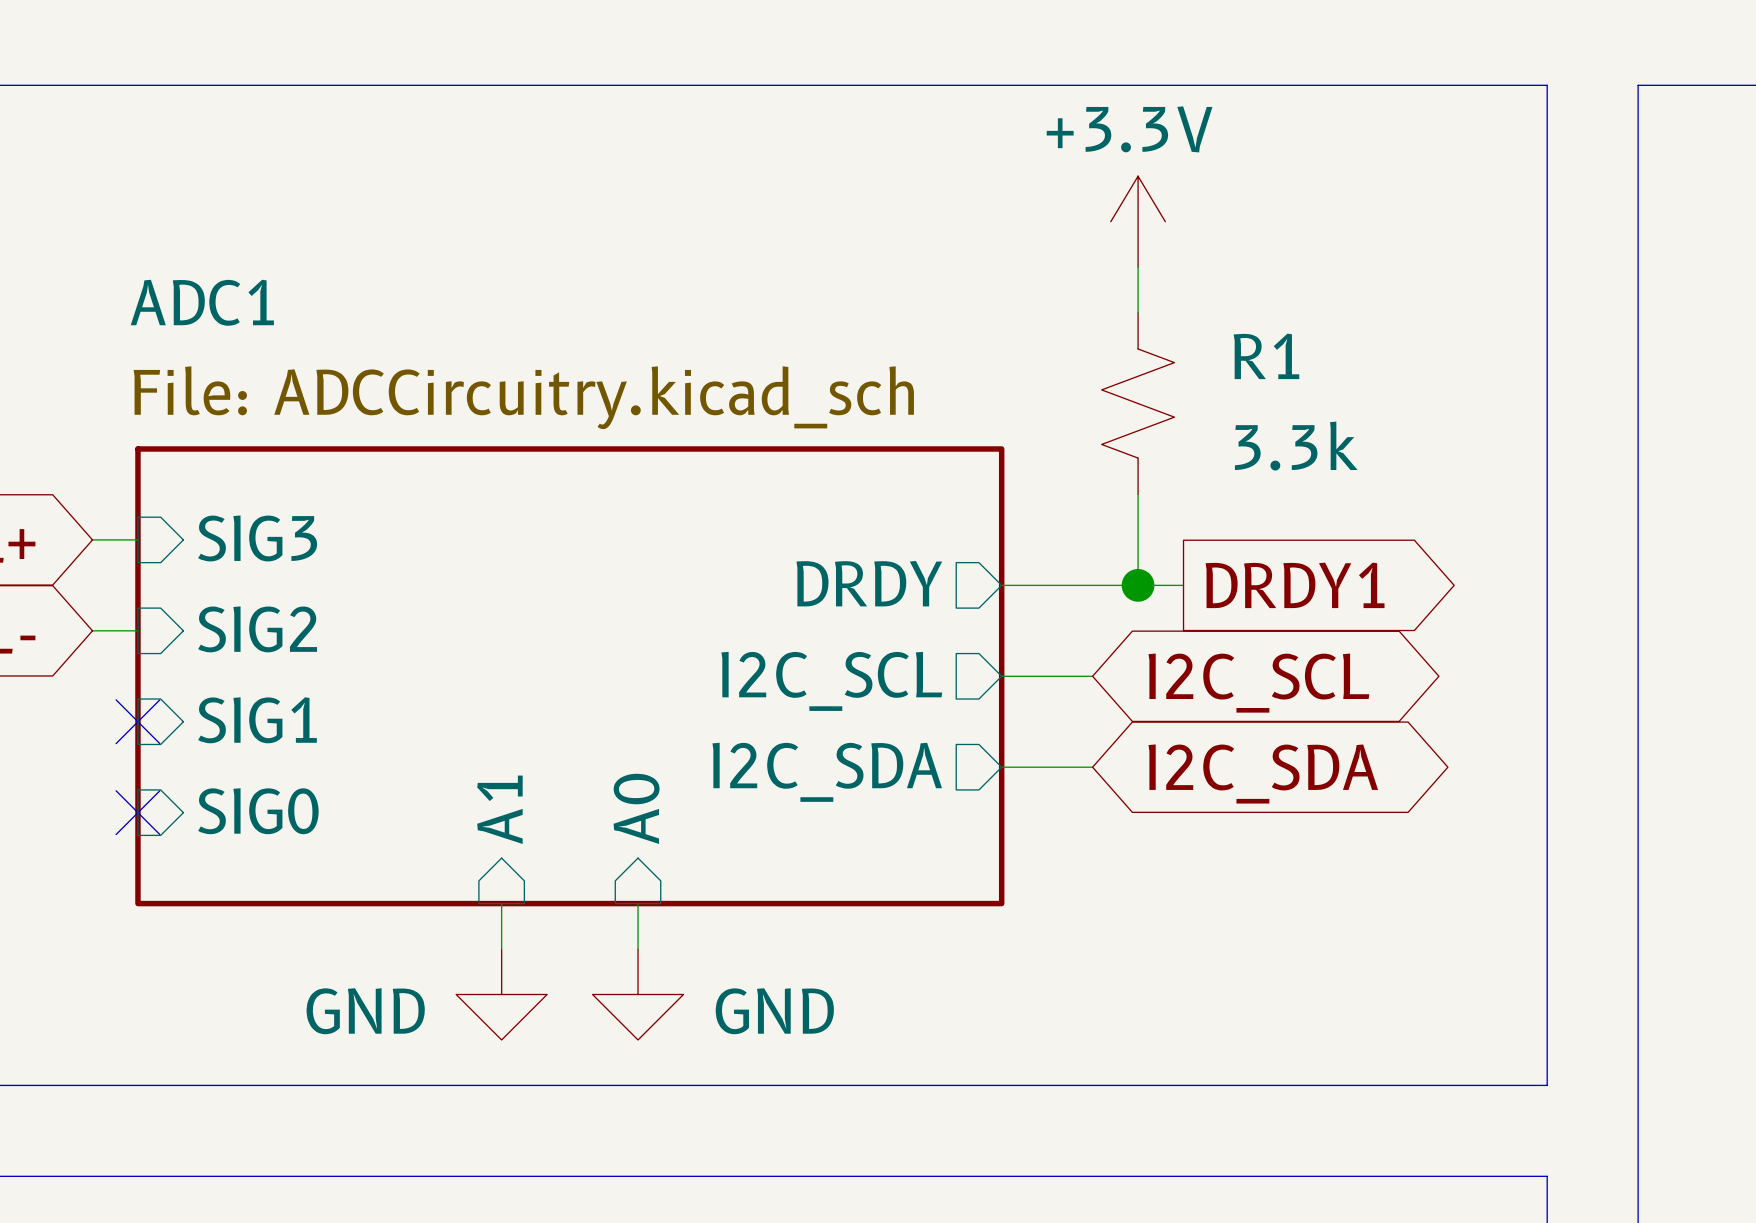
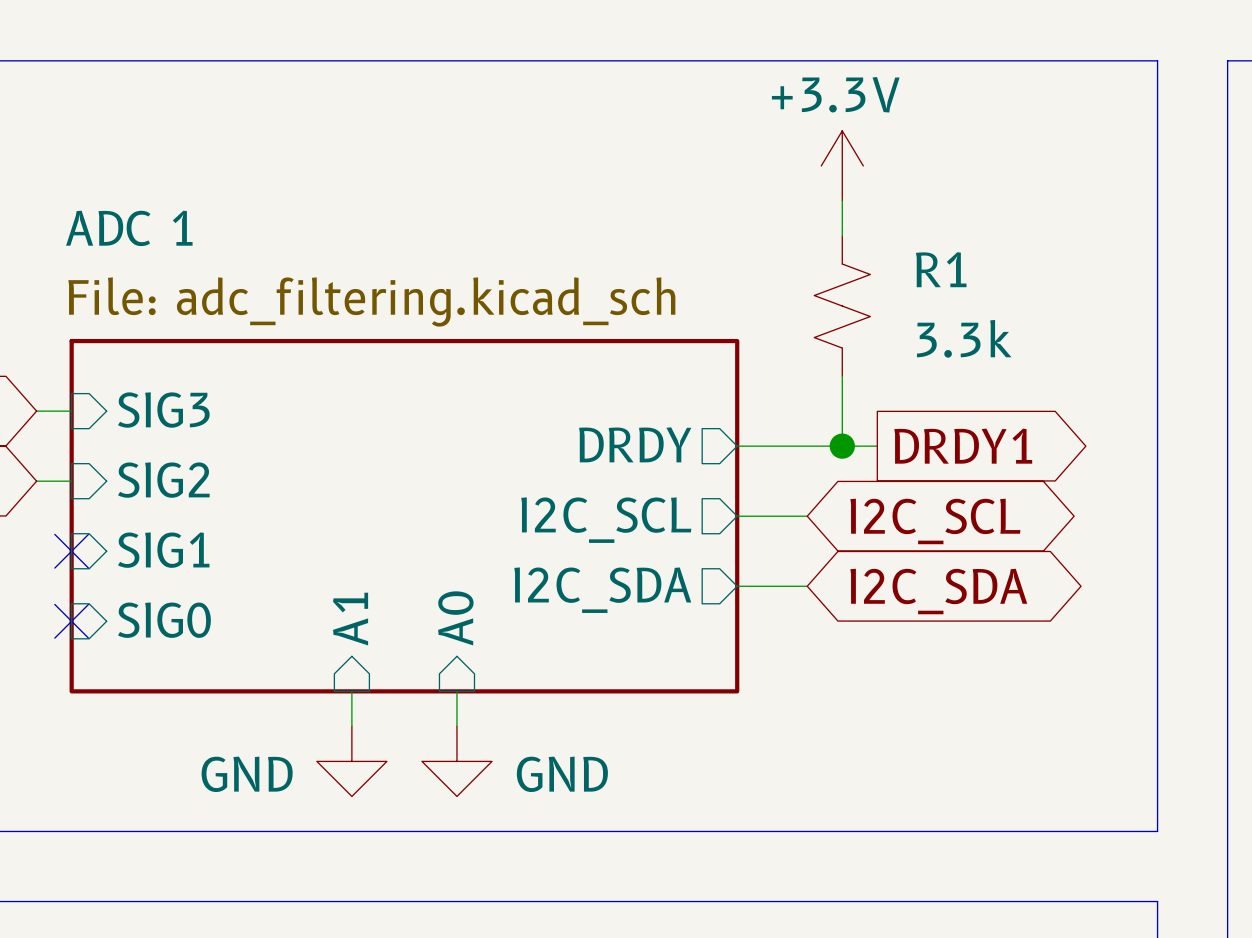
sheet ADC1 name: ADC1 (202, 302) -> ADC 1 (129, 228)
sheet ADC1 value: File: ADCCircuitry.kicad_sch (523, 397) -> File: adc_filtering.kicad_sch (371, 302)

